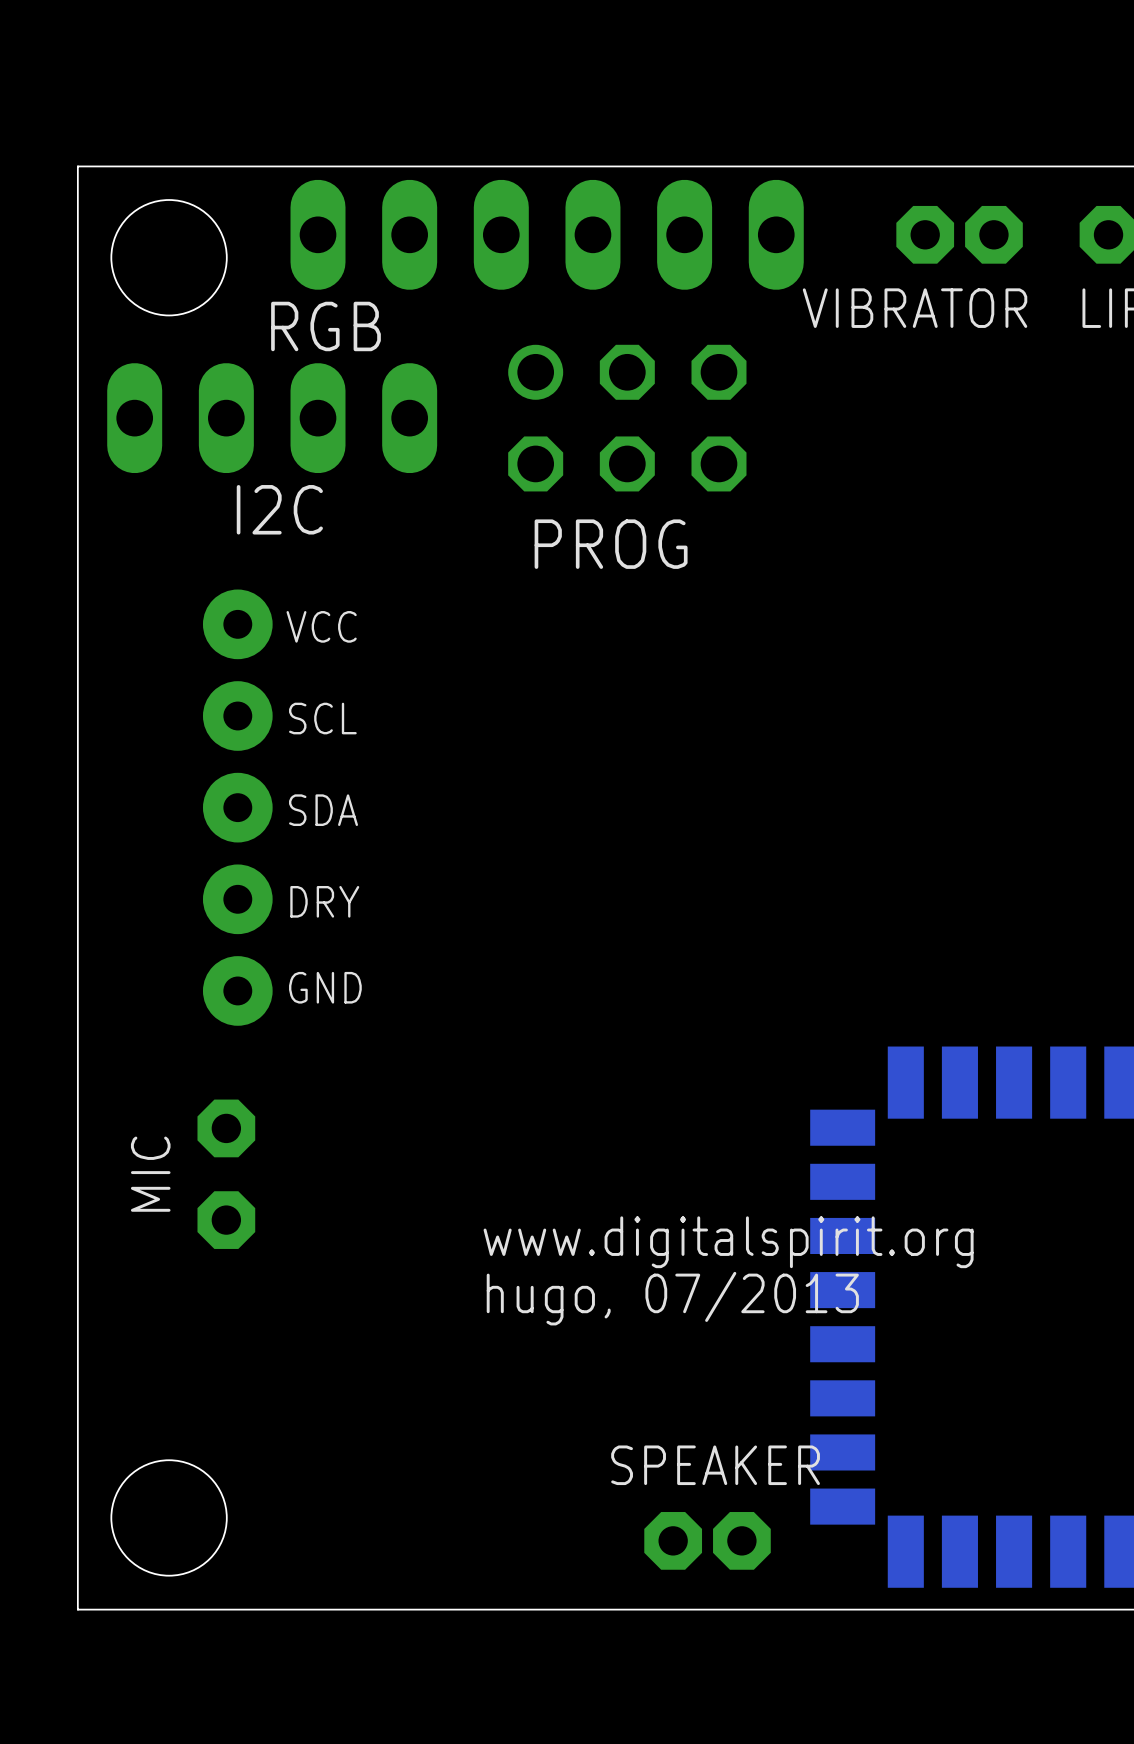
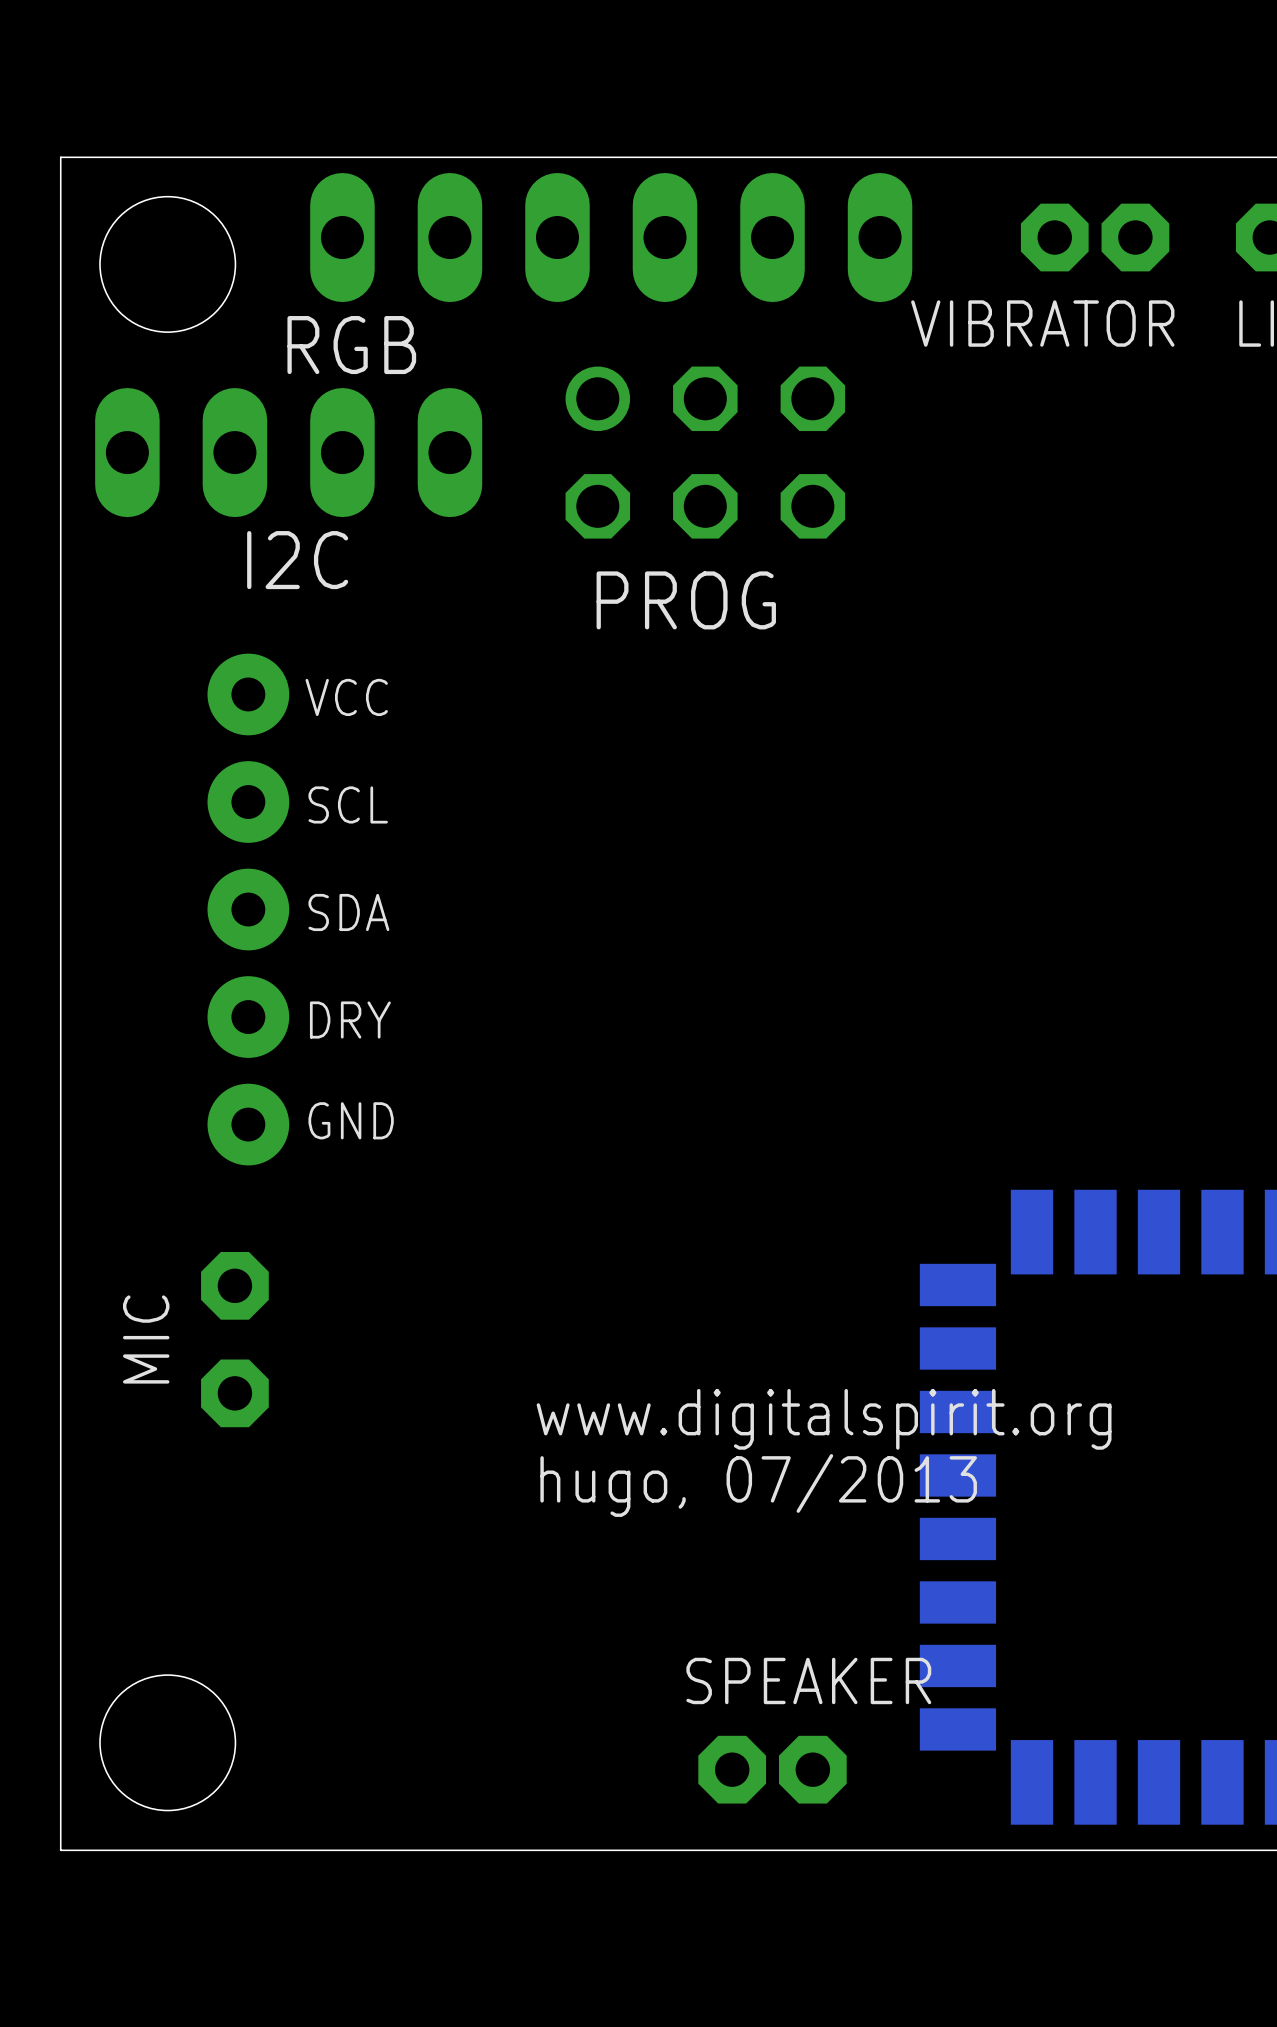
part: none -> (732, 1769)
part: (673, 1540) -> none
part: none -> (812, 1769)
part: (741, 1540) -> none

